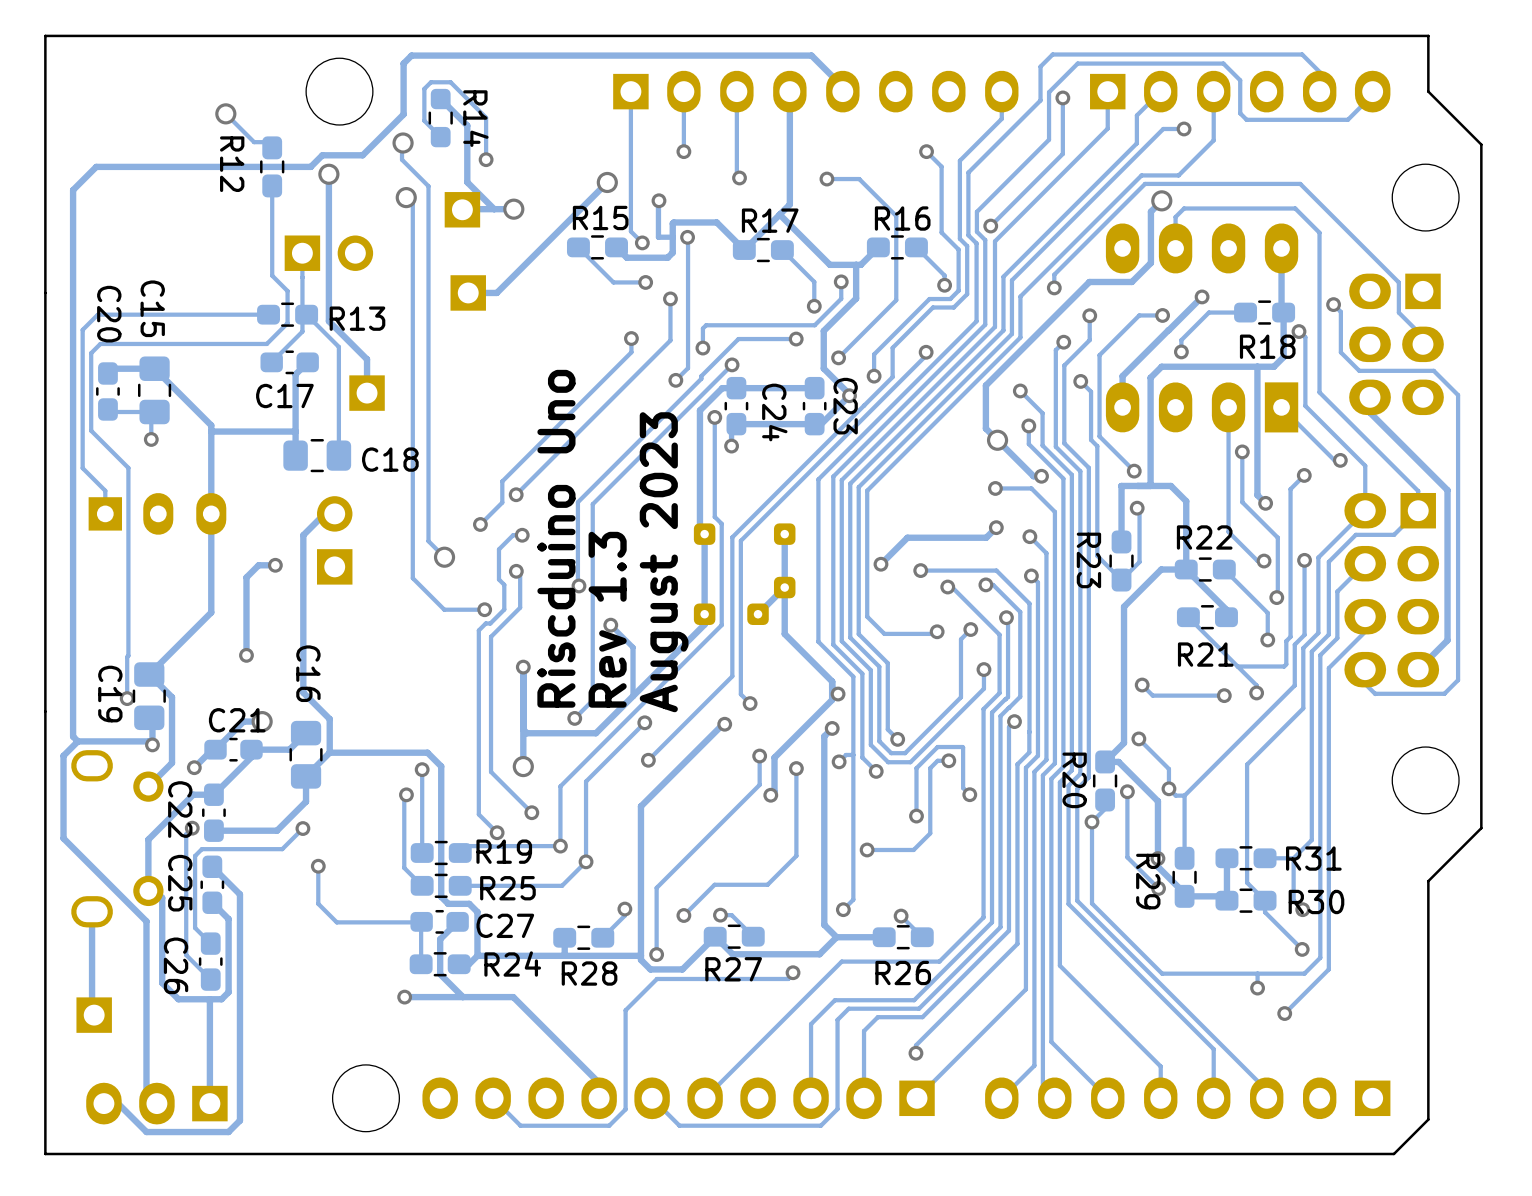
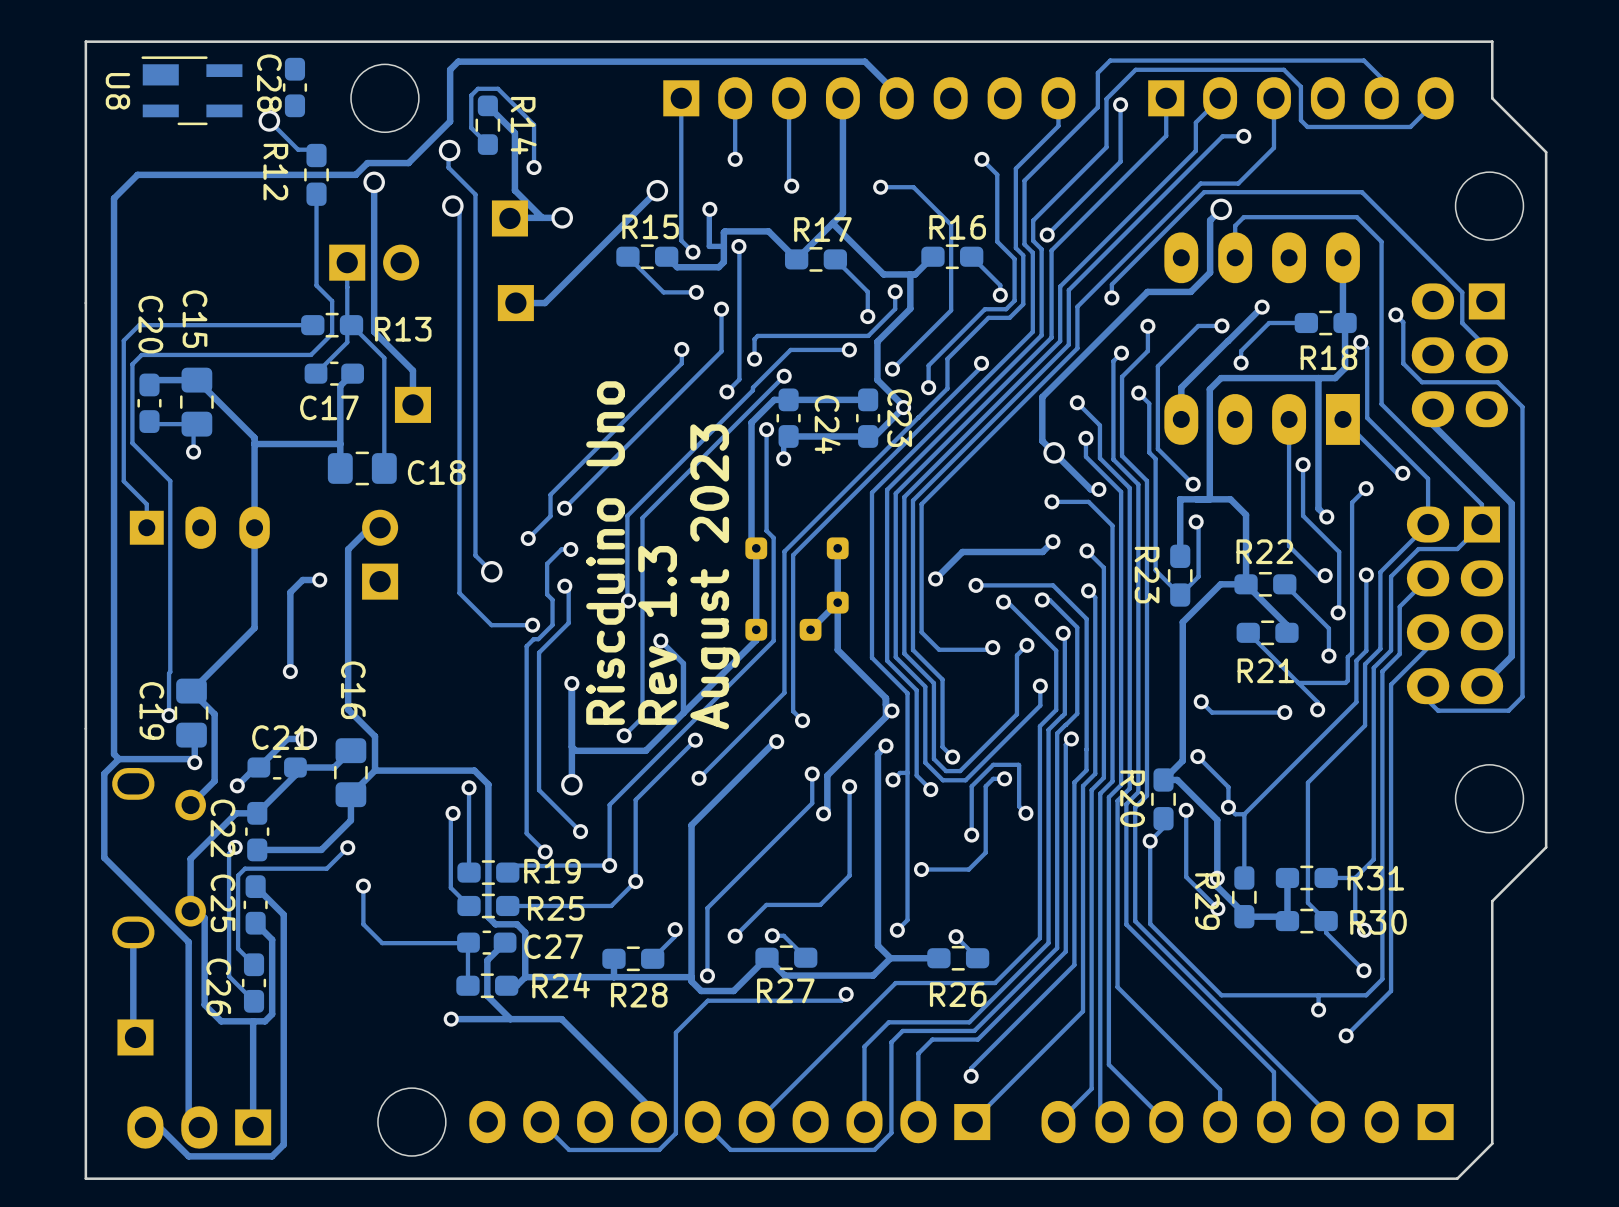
C28: none -> (294, 87)
U8: none -> (191, 90)

